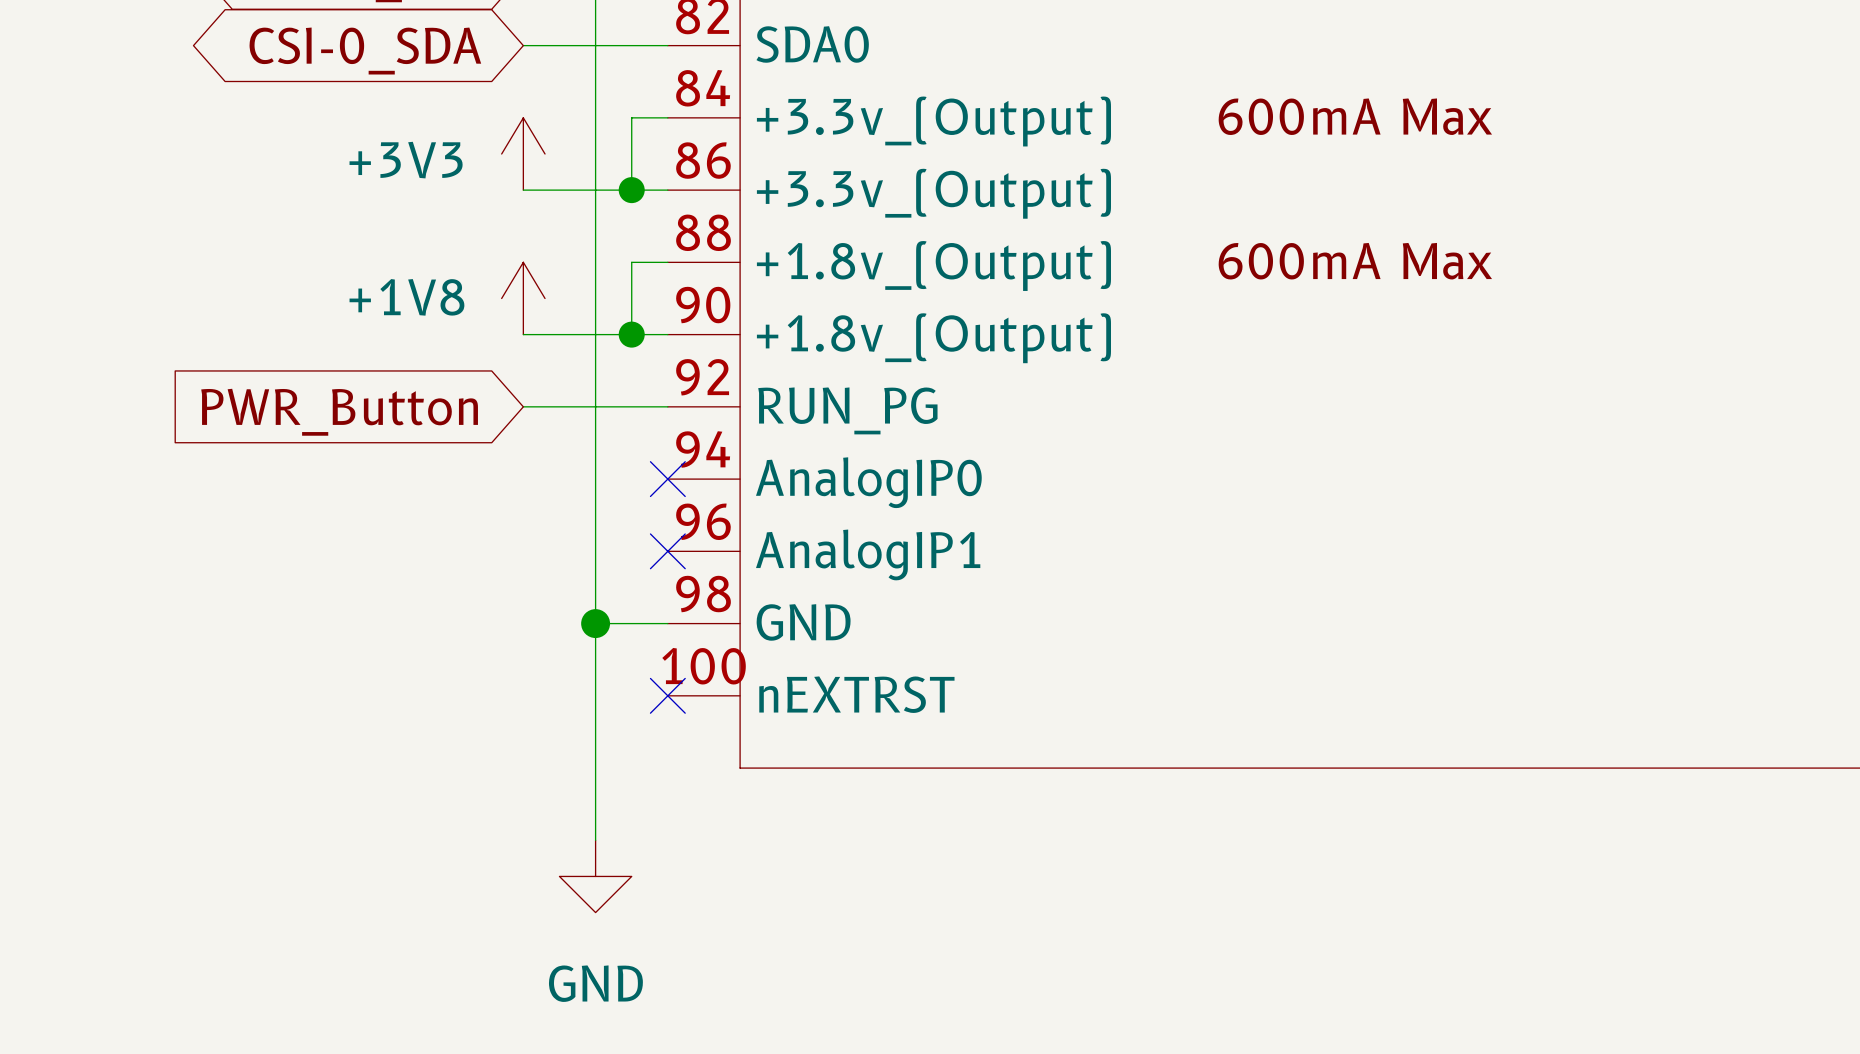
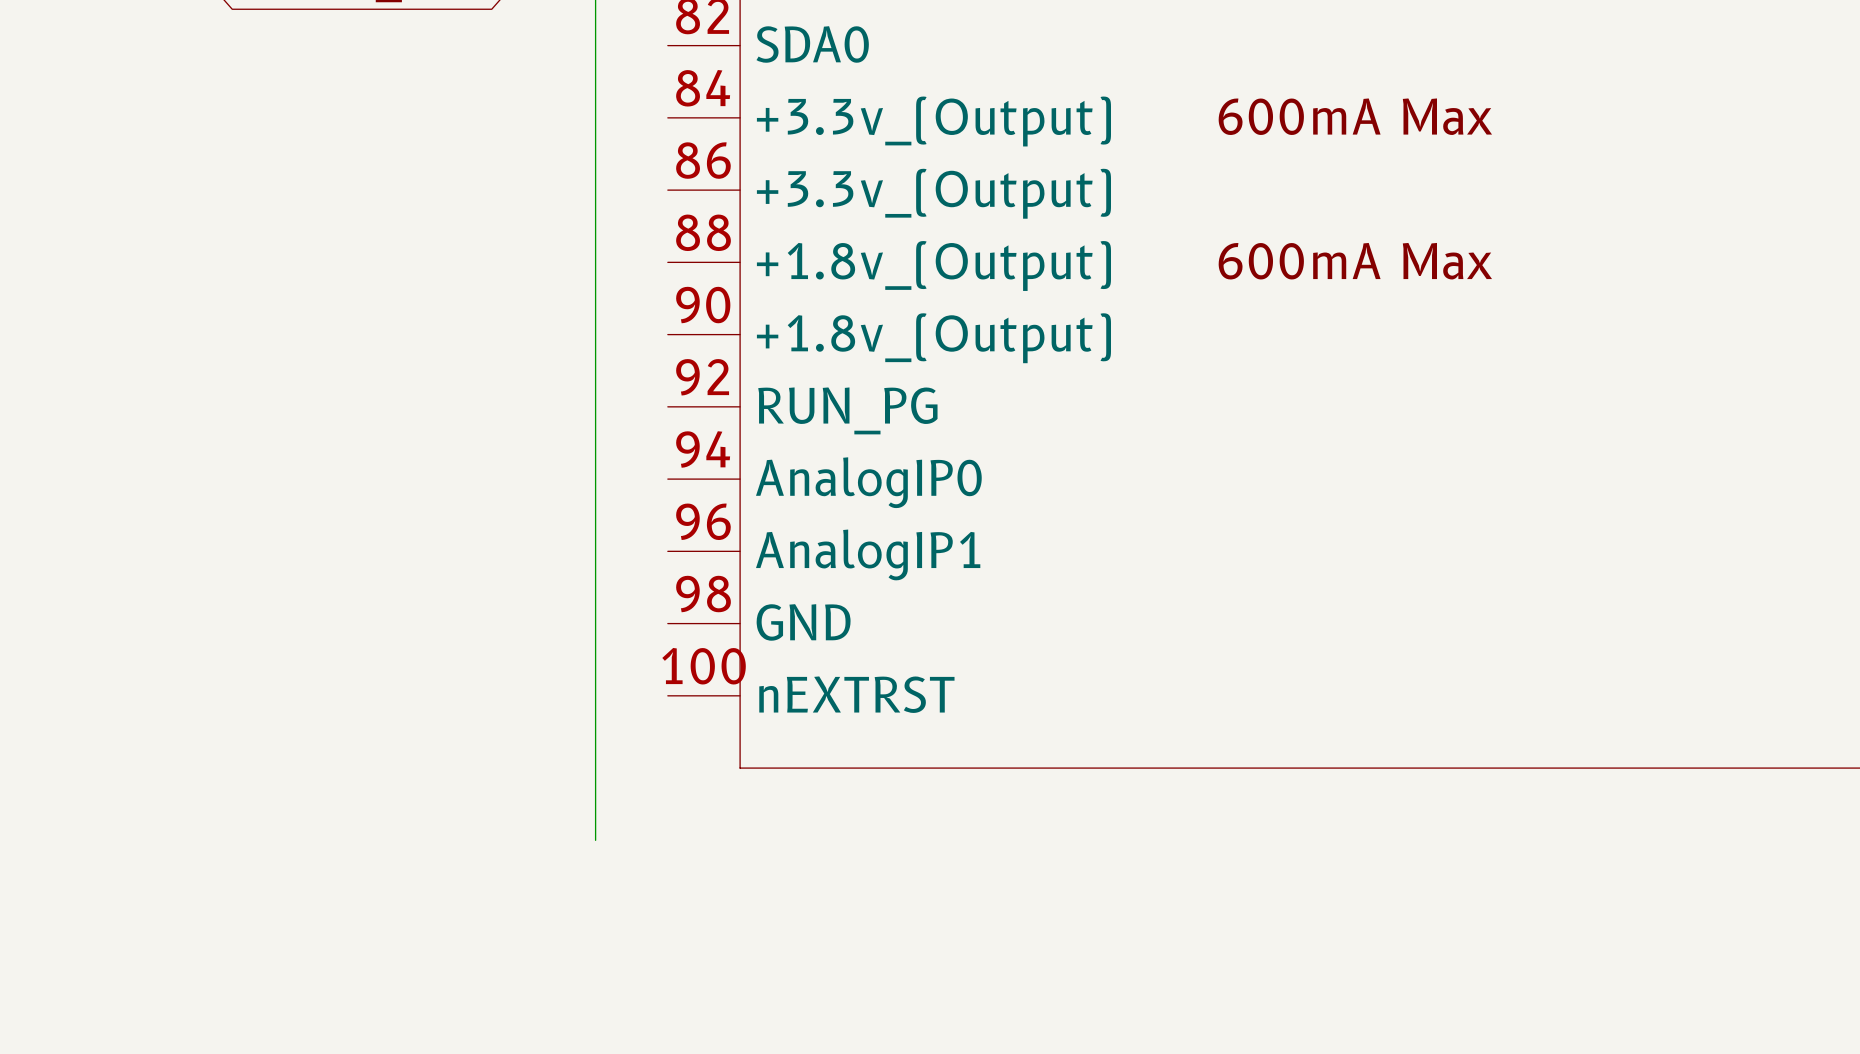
wire: (523, 45) (667, 45) -> none
global label: CSI-0_SDA (365, 51) -> none
wire: (667, 117) (631, 117) (631, 190) -> none
power symbol: +3V3 (523, 153) -> none
wire: (523, 190) (667, 190) -> none
junction: (631, 190) -> none
wire: (667, 262) (631, 262) (631, 334) -> none
power symbol: +1V8 (523, 298) -> none
wire: (523, 334) (667, 334) -> none
junction: (631, 334) -> none
wire: (523, 406) (667, 406) -> none
global label: PWR_Button (339, 412) -> none
no-connect mark: (667, 479) -> none
no-connect mark: (667, 551) -> none
wire: (595, 623) (667, 623) -> none
junction: (595, 623) -> none
no-connect mark: (667, 695) -> none
power symbol: GND (595, 876) -> none

